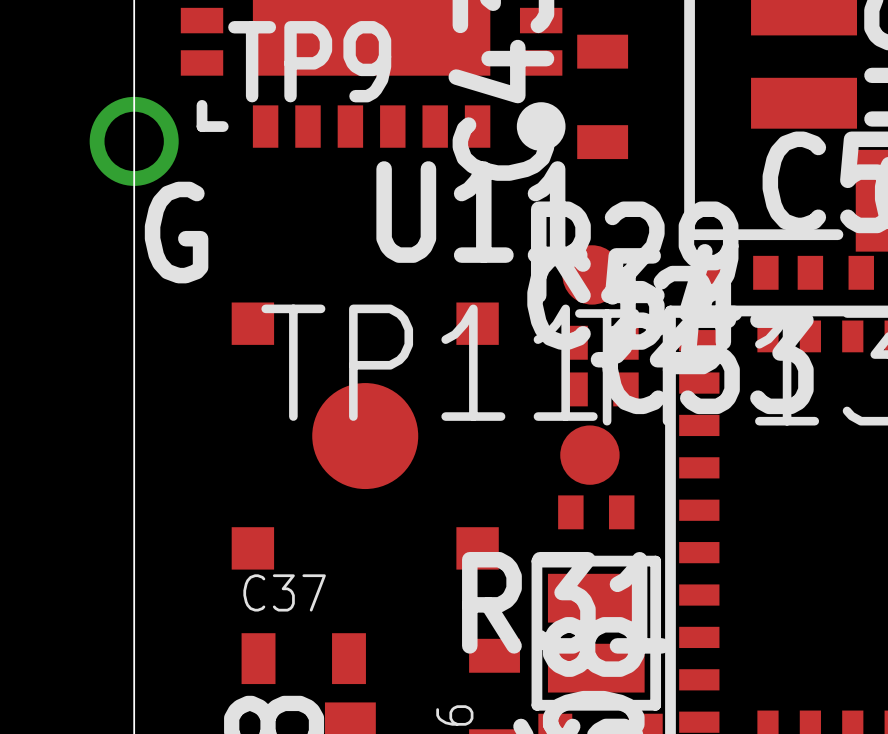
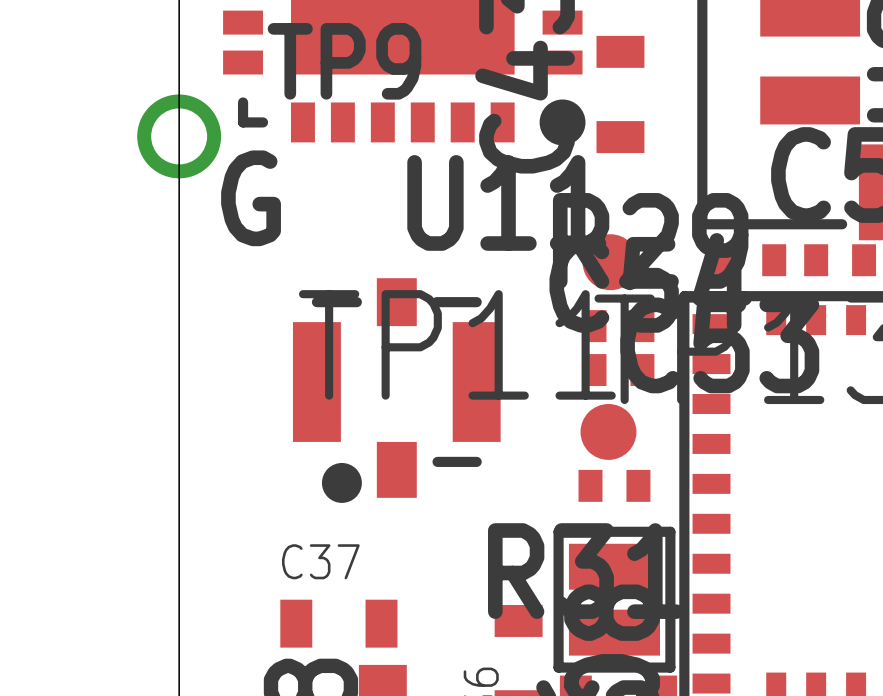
text position: G (176, 232) -> G (251, 198)
part: none -> (396, 390)
part: (365, 436) -> none

